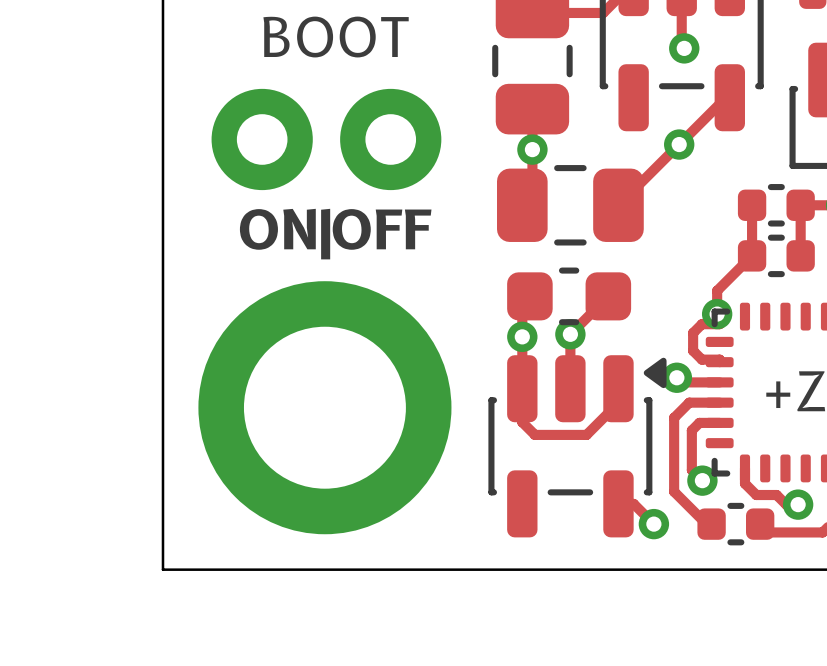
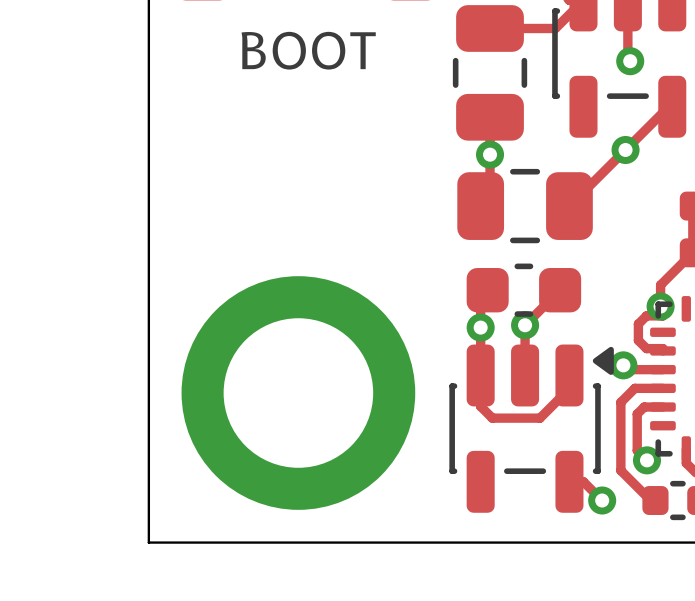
part: (326, 139) -> none
text: ON|OFF (335, 234) -> none

